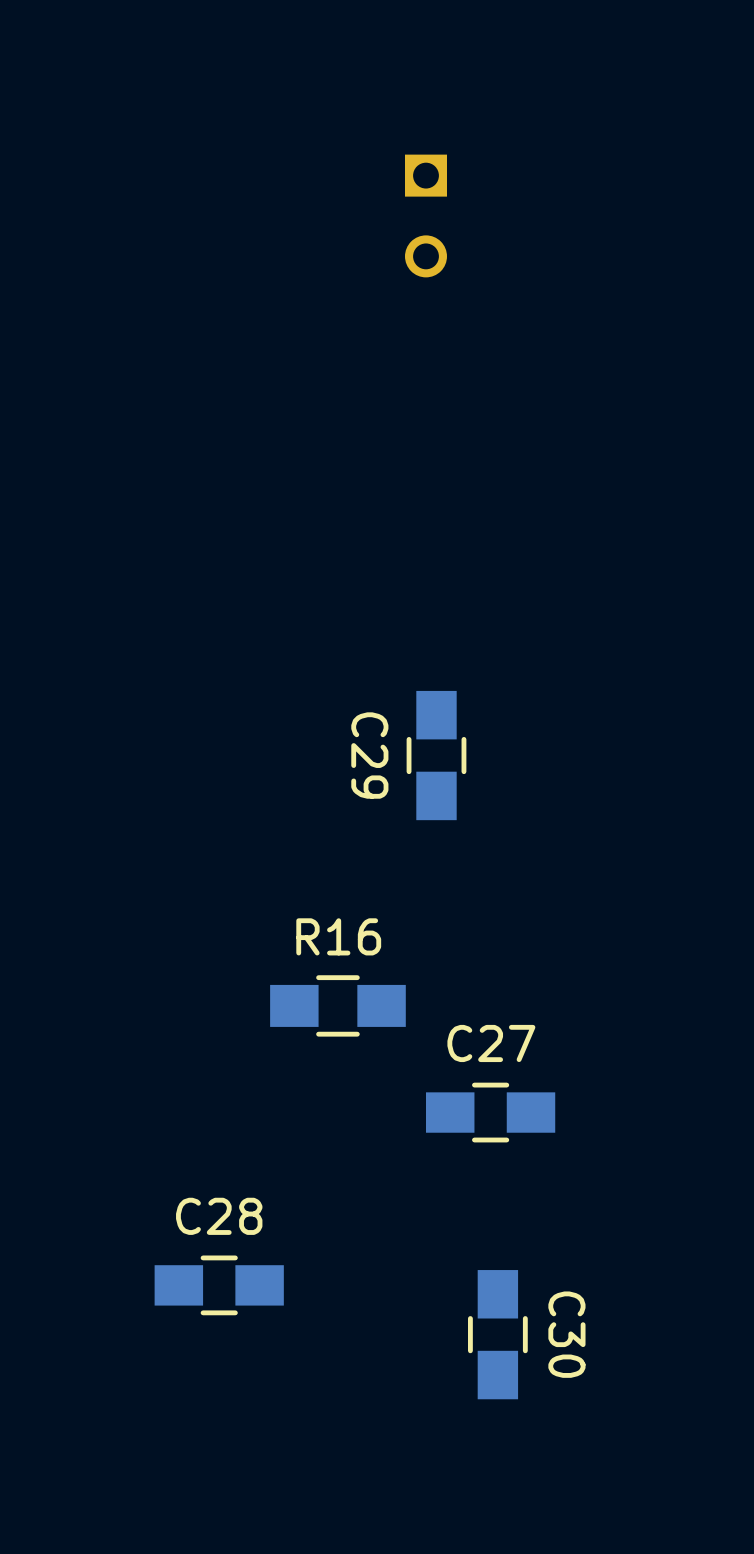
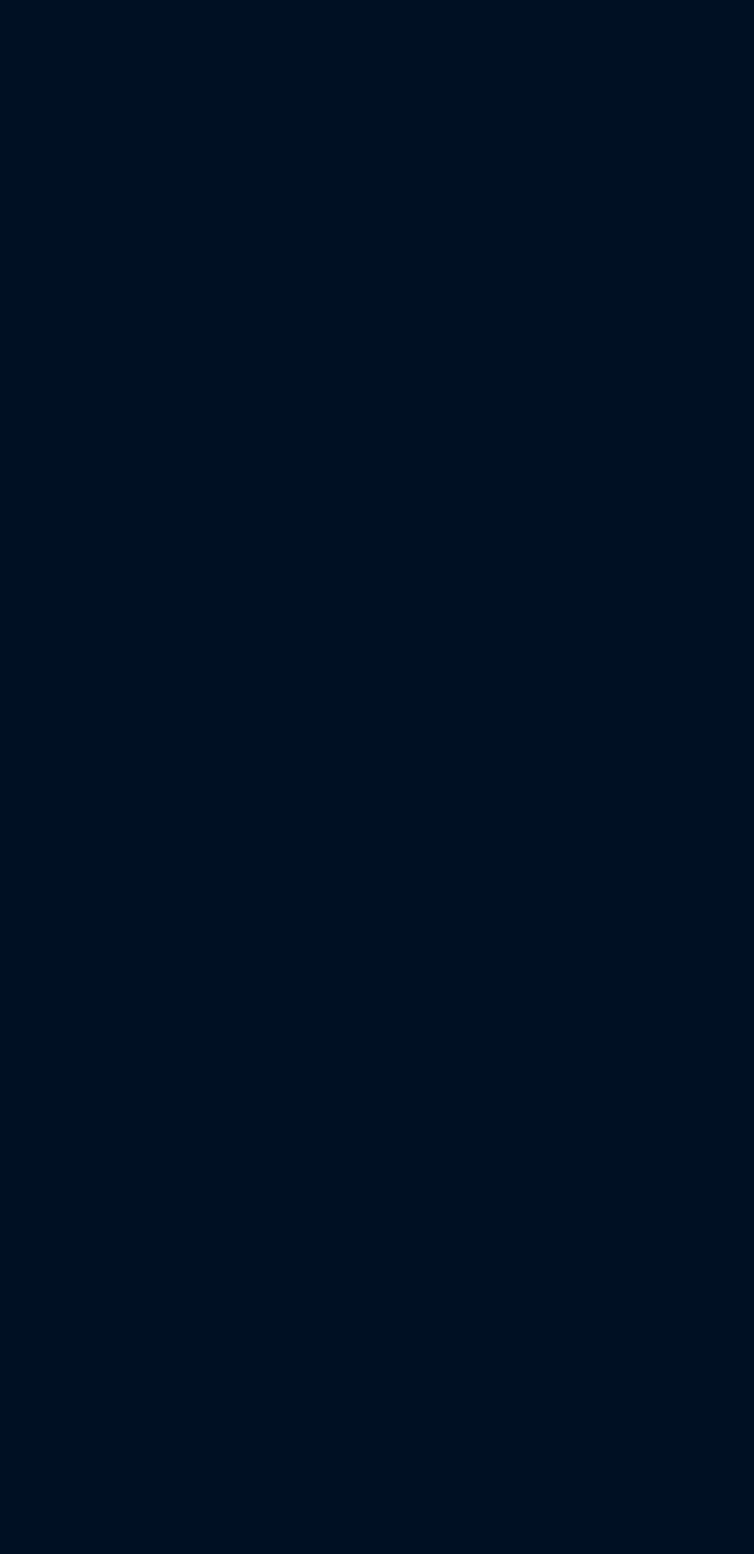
part: (426, 216) -> none
C29: (436, 755) -> none
R16: (337, 1005) -> none
C27: (490, 1112) -> none
C28: (219, 1285) -> none
C30: (497, 1334) -> none

